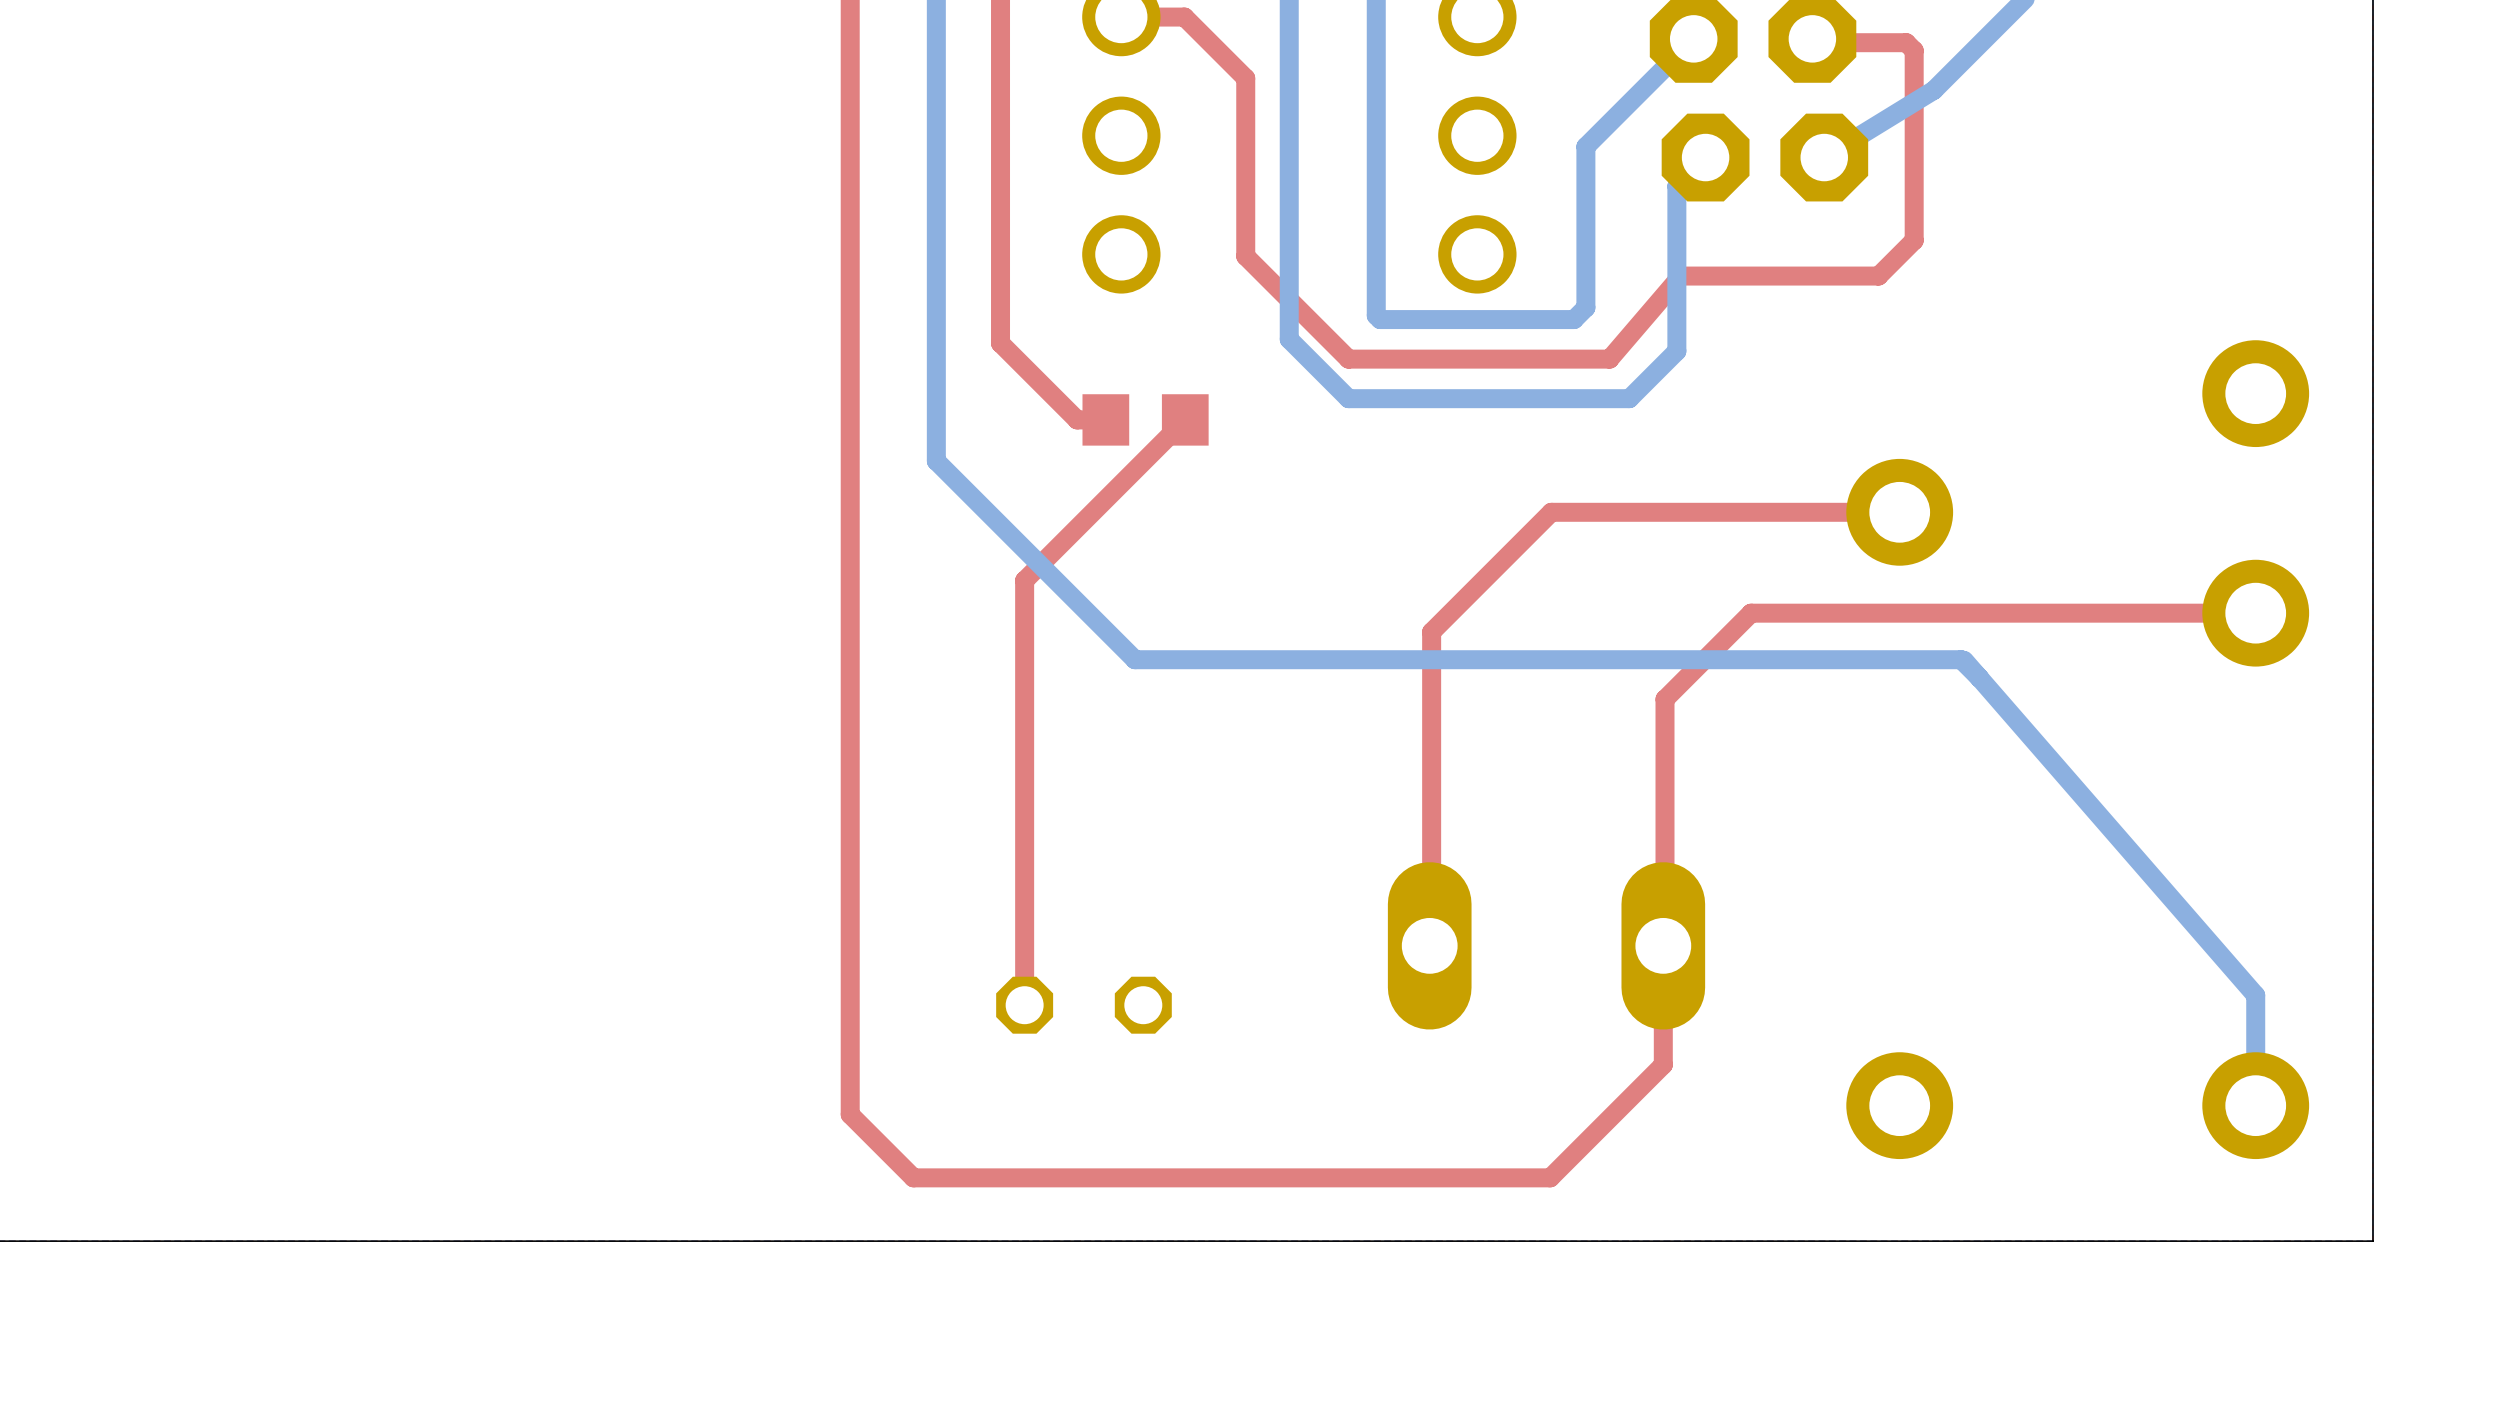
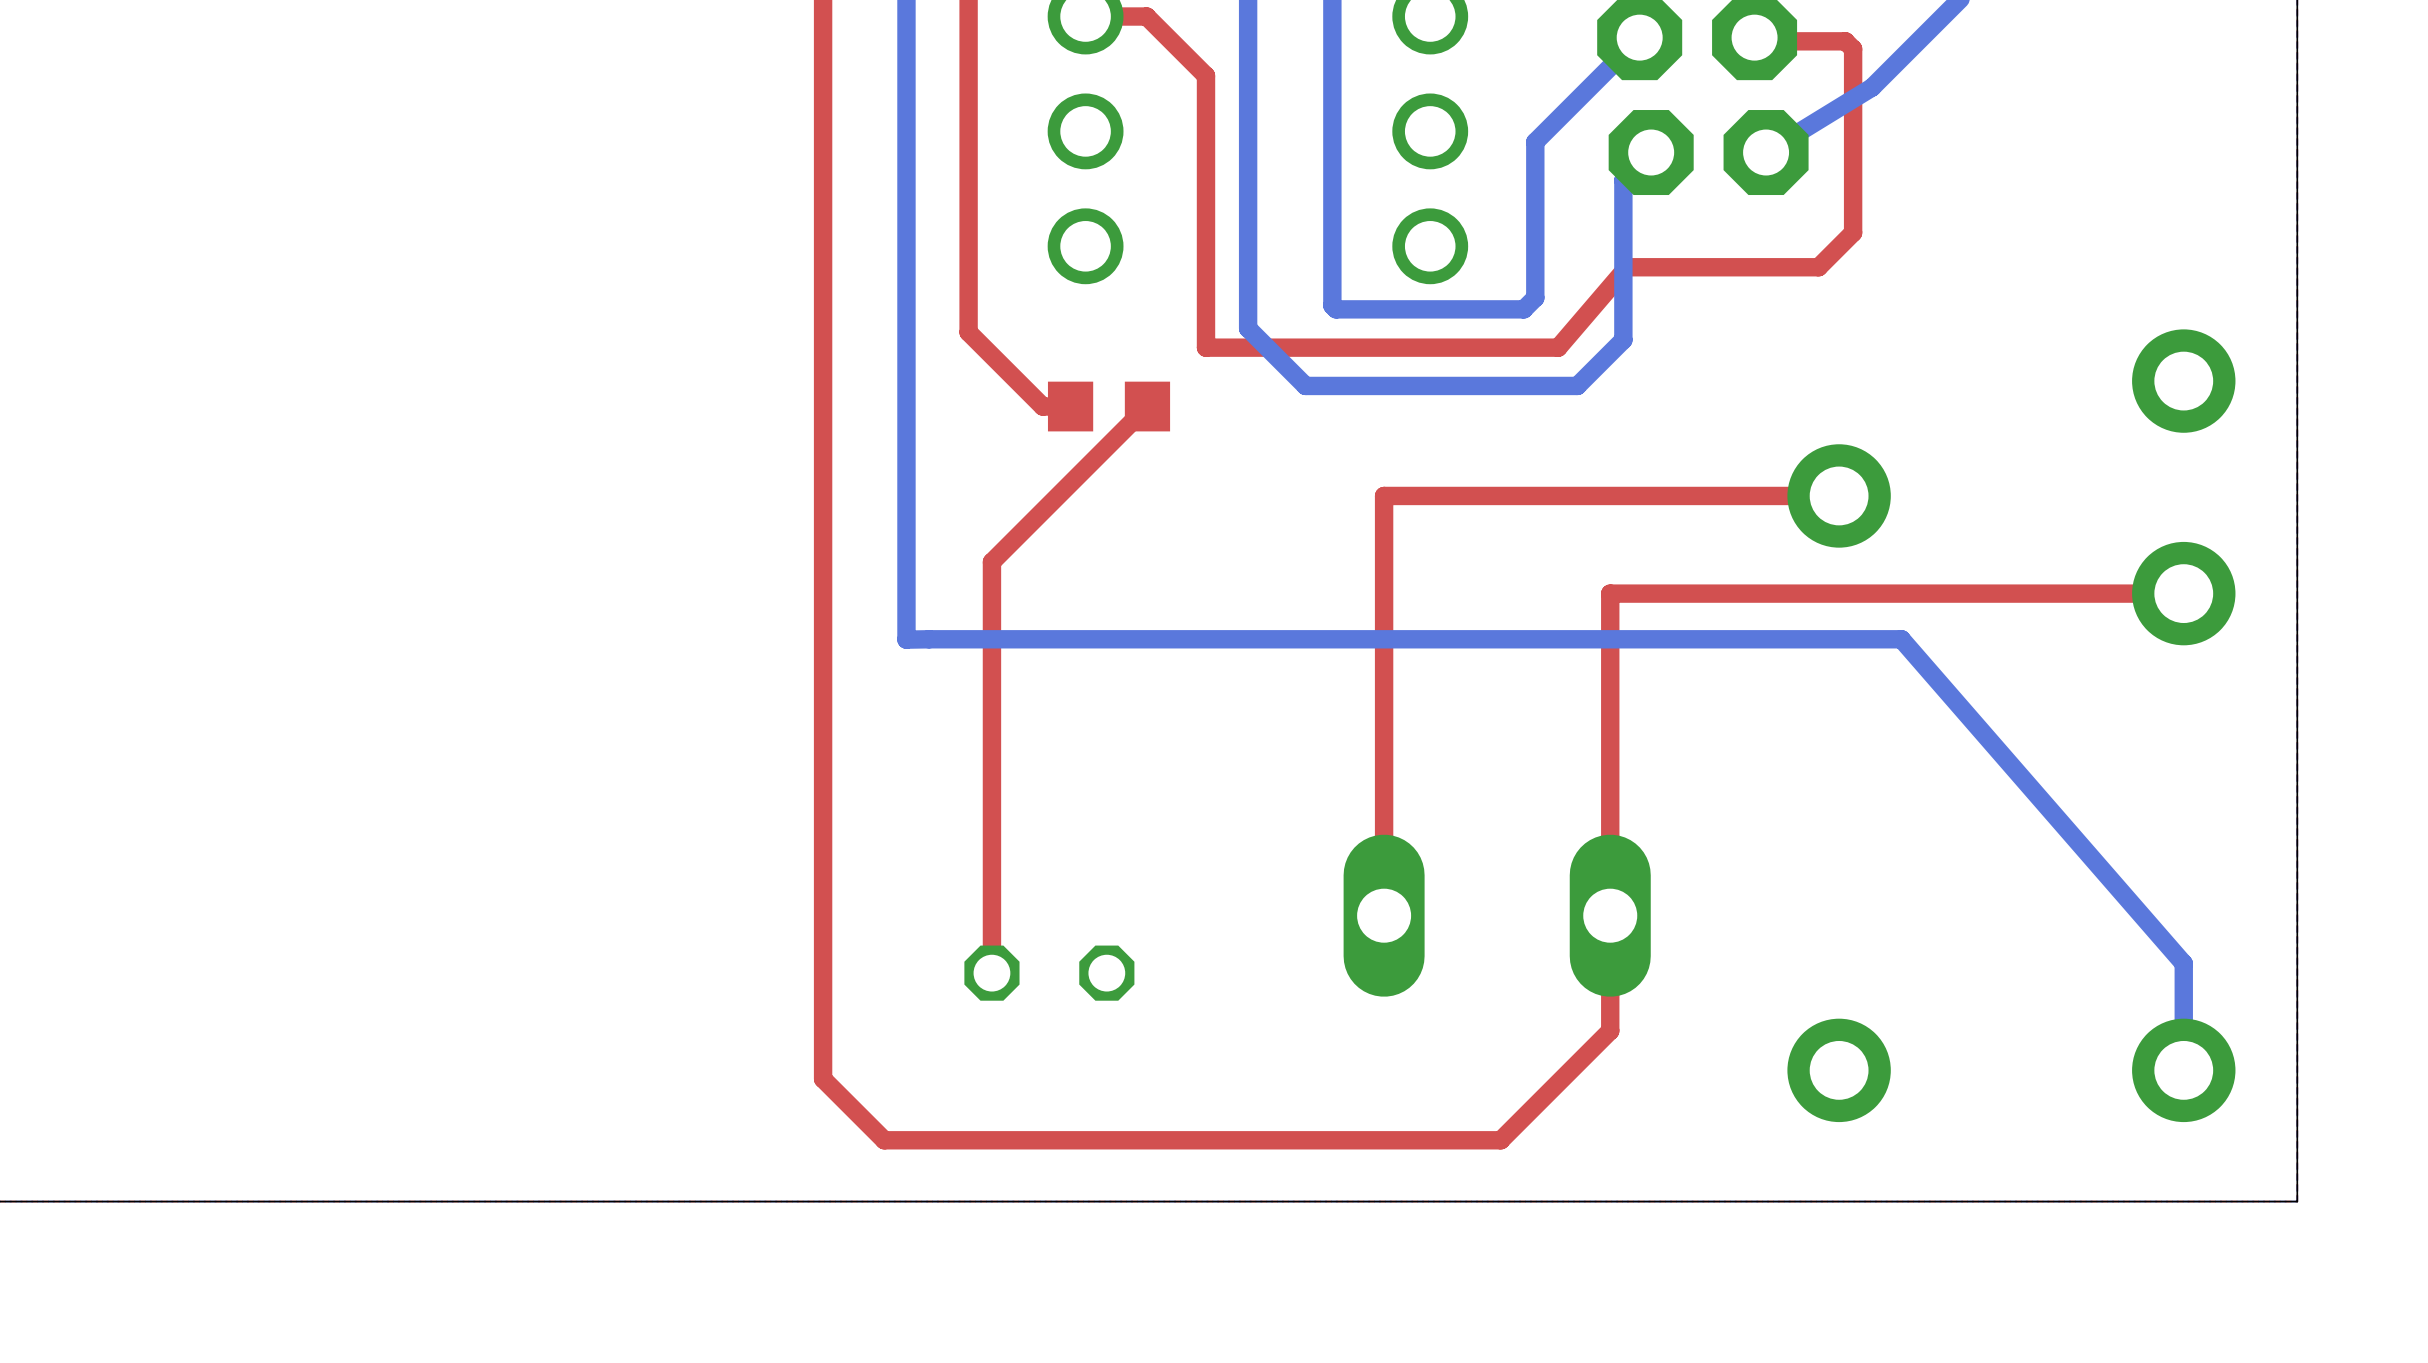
top track: (1245, 256) (1348, 359) -> (1206, 248) (1206, 347) (1305, 347)
bottom track: (936, 461) (1134, 659) (1961, 659) (1979, 678) -> (906, 446) (906, 639) (1901, 639)
top track: (1551, 512) (1431, 632) (1431, 943) (1429, 945) -> (1501, 495) (1384, 495) (1384, 915)
top track: (1751, 613) (1665, 699) (1665, 974) (1663, 976) -> (1695, 593) (1610, 593) (1610, 915)

